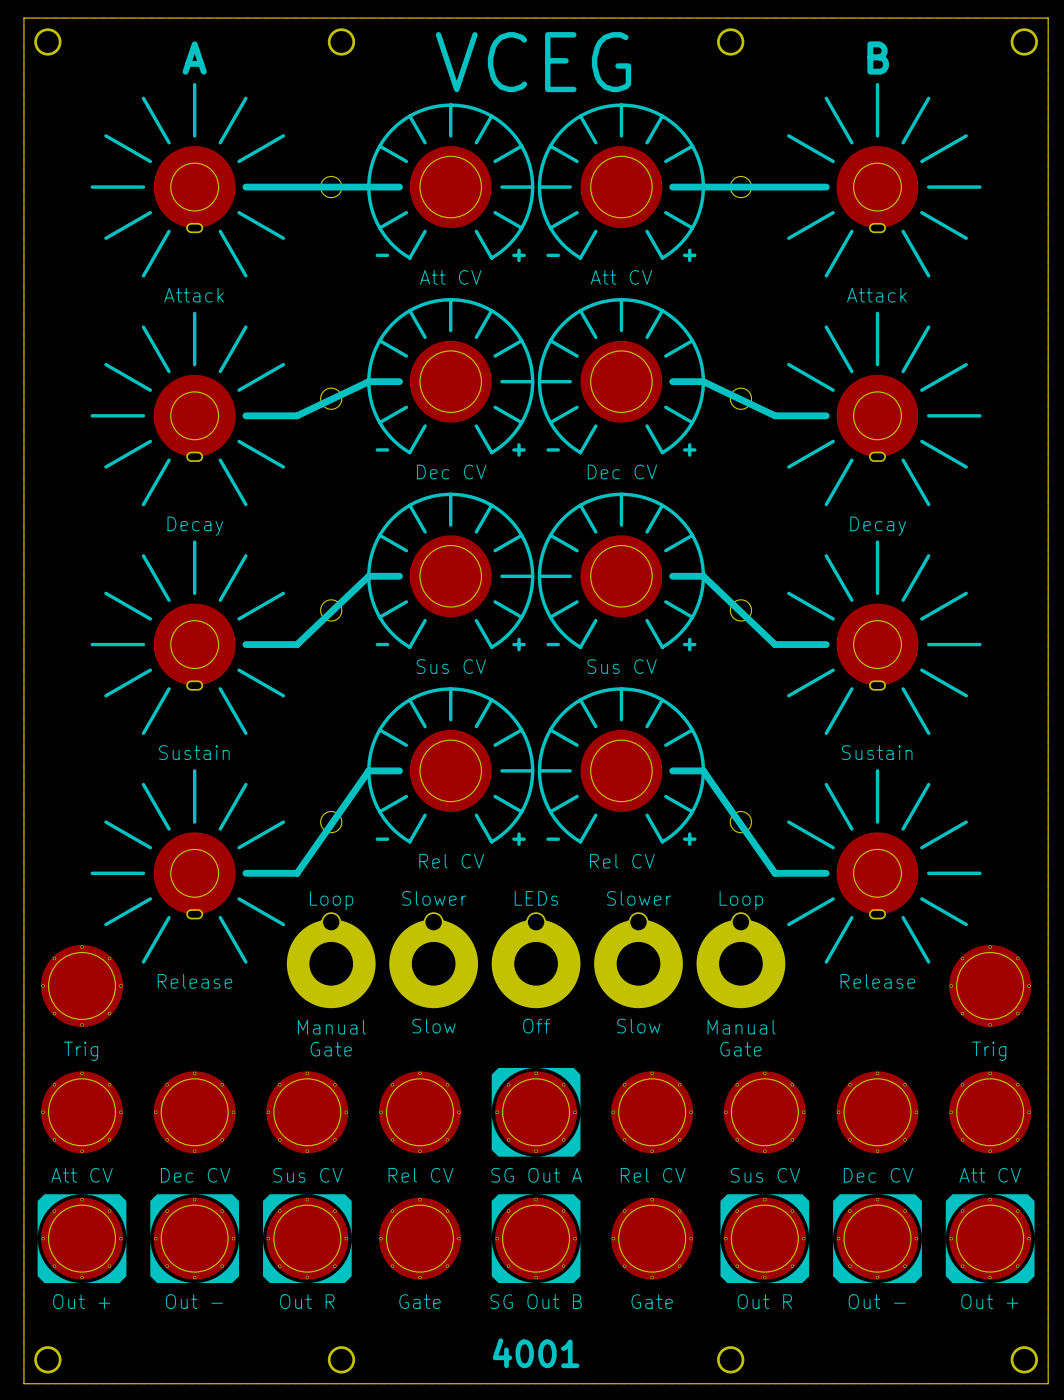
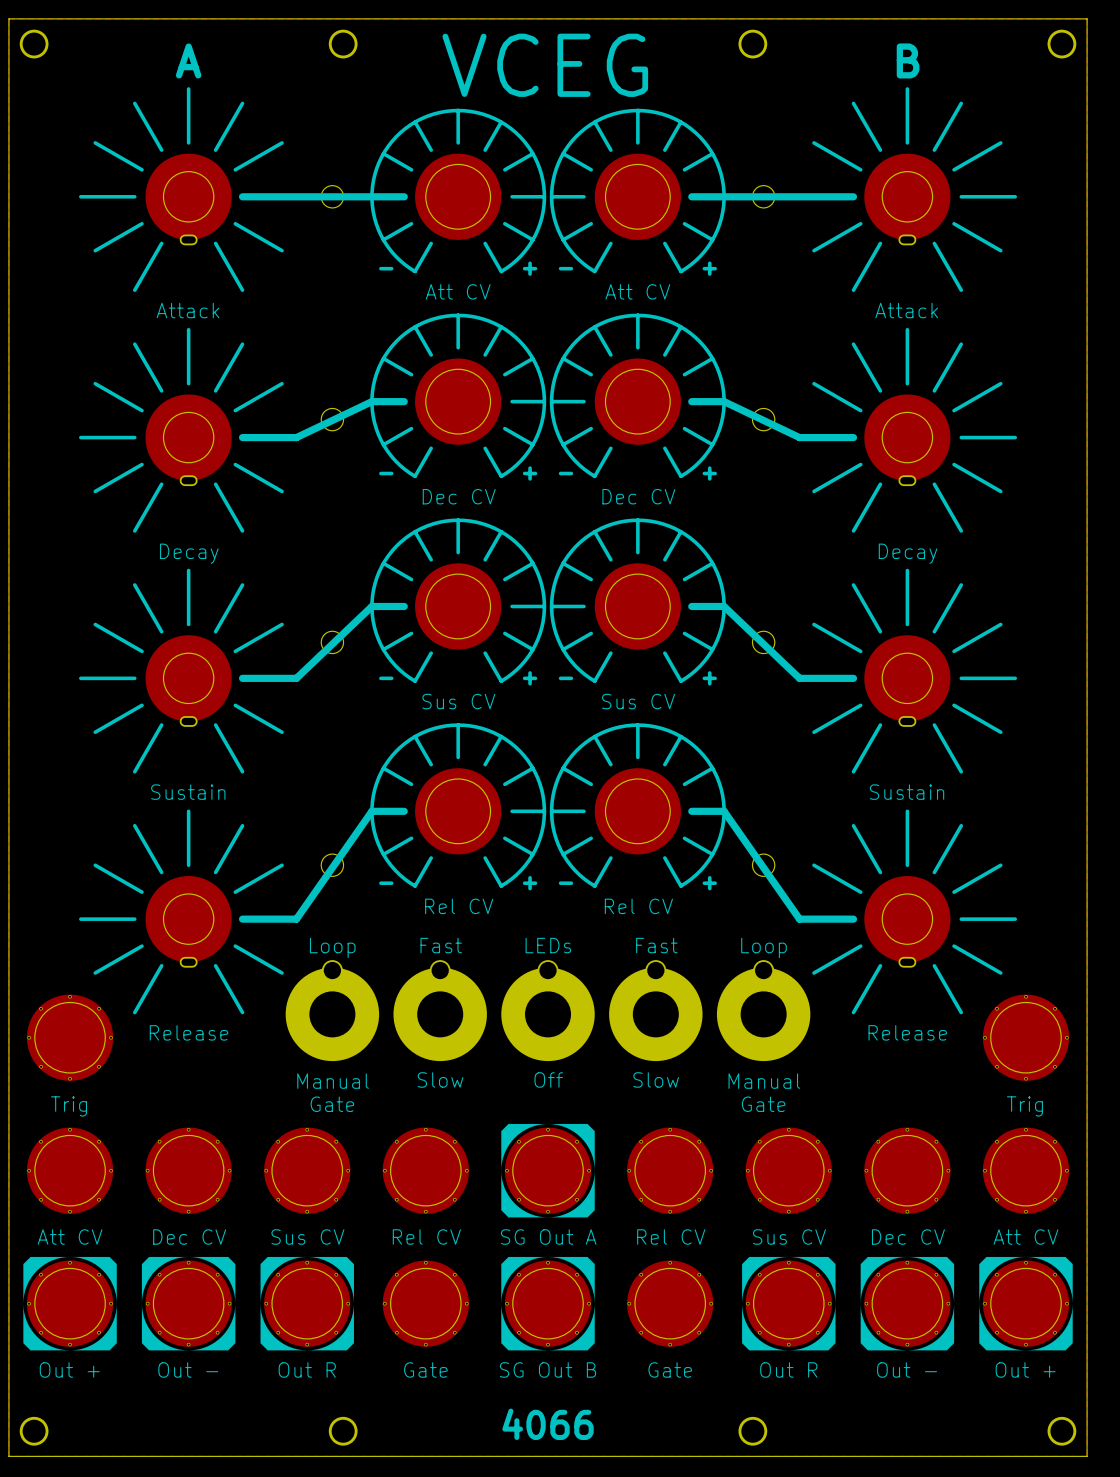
text: Slower (434, 898) -> Fast (441, 945)
text: Slower (639, 898) -> Fast (656, 945)
text: 4001 (536, 1353) -> 4066 (548, 1424)

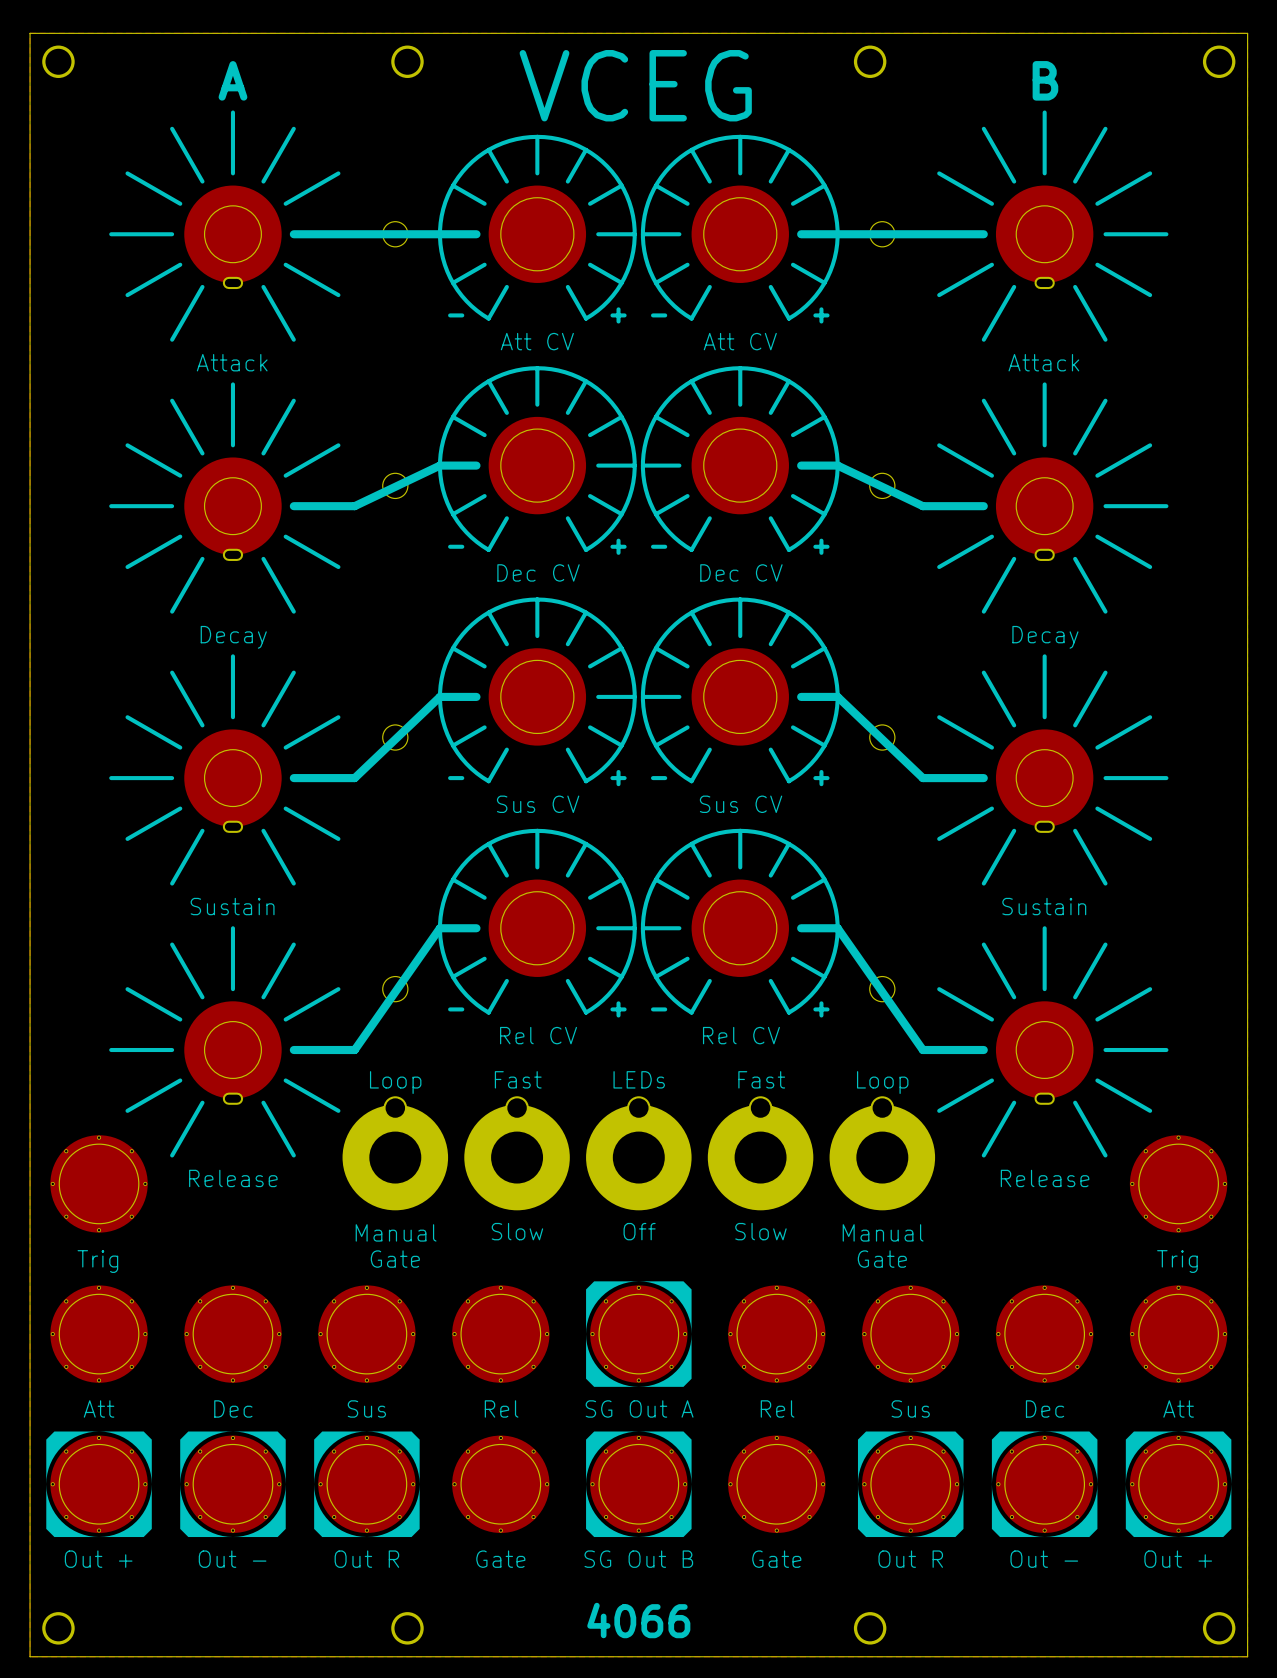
part value: Att CV (70, 1237) -> Att (99, 1408)
part value: Dec CV (189, 1237) -> Dec (233, 1408)
part value: Sus CV (307, 1237) -> Sus (366, 1408)
part value: Rel CV (426, 1237) -> Rel (501, 1408)
part value: Rel CV (671, 1237) -> Rel (777, 1408)
part value: Sus CV (789, 1237) -> Sus (910, 1408)
part value: Dec CV (908, 1237) -> Dec (1045, 1408)
part value: Att CV (1025, 1237) -> Att (1178, 1408)

